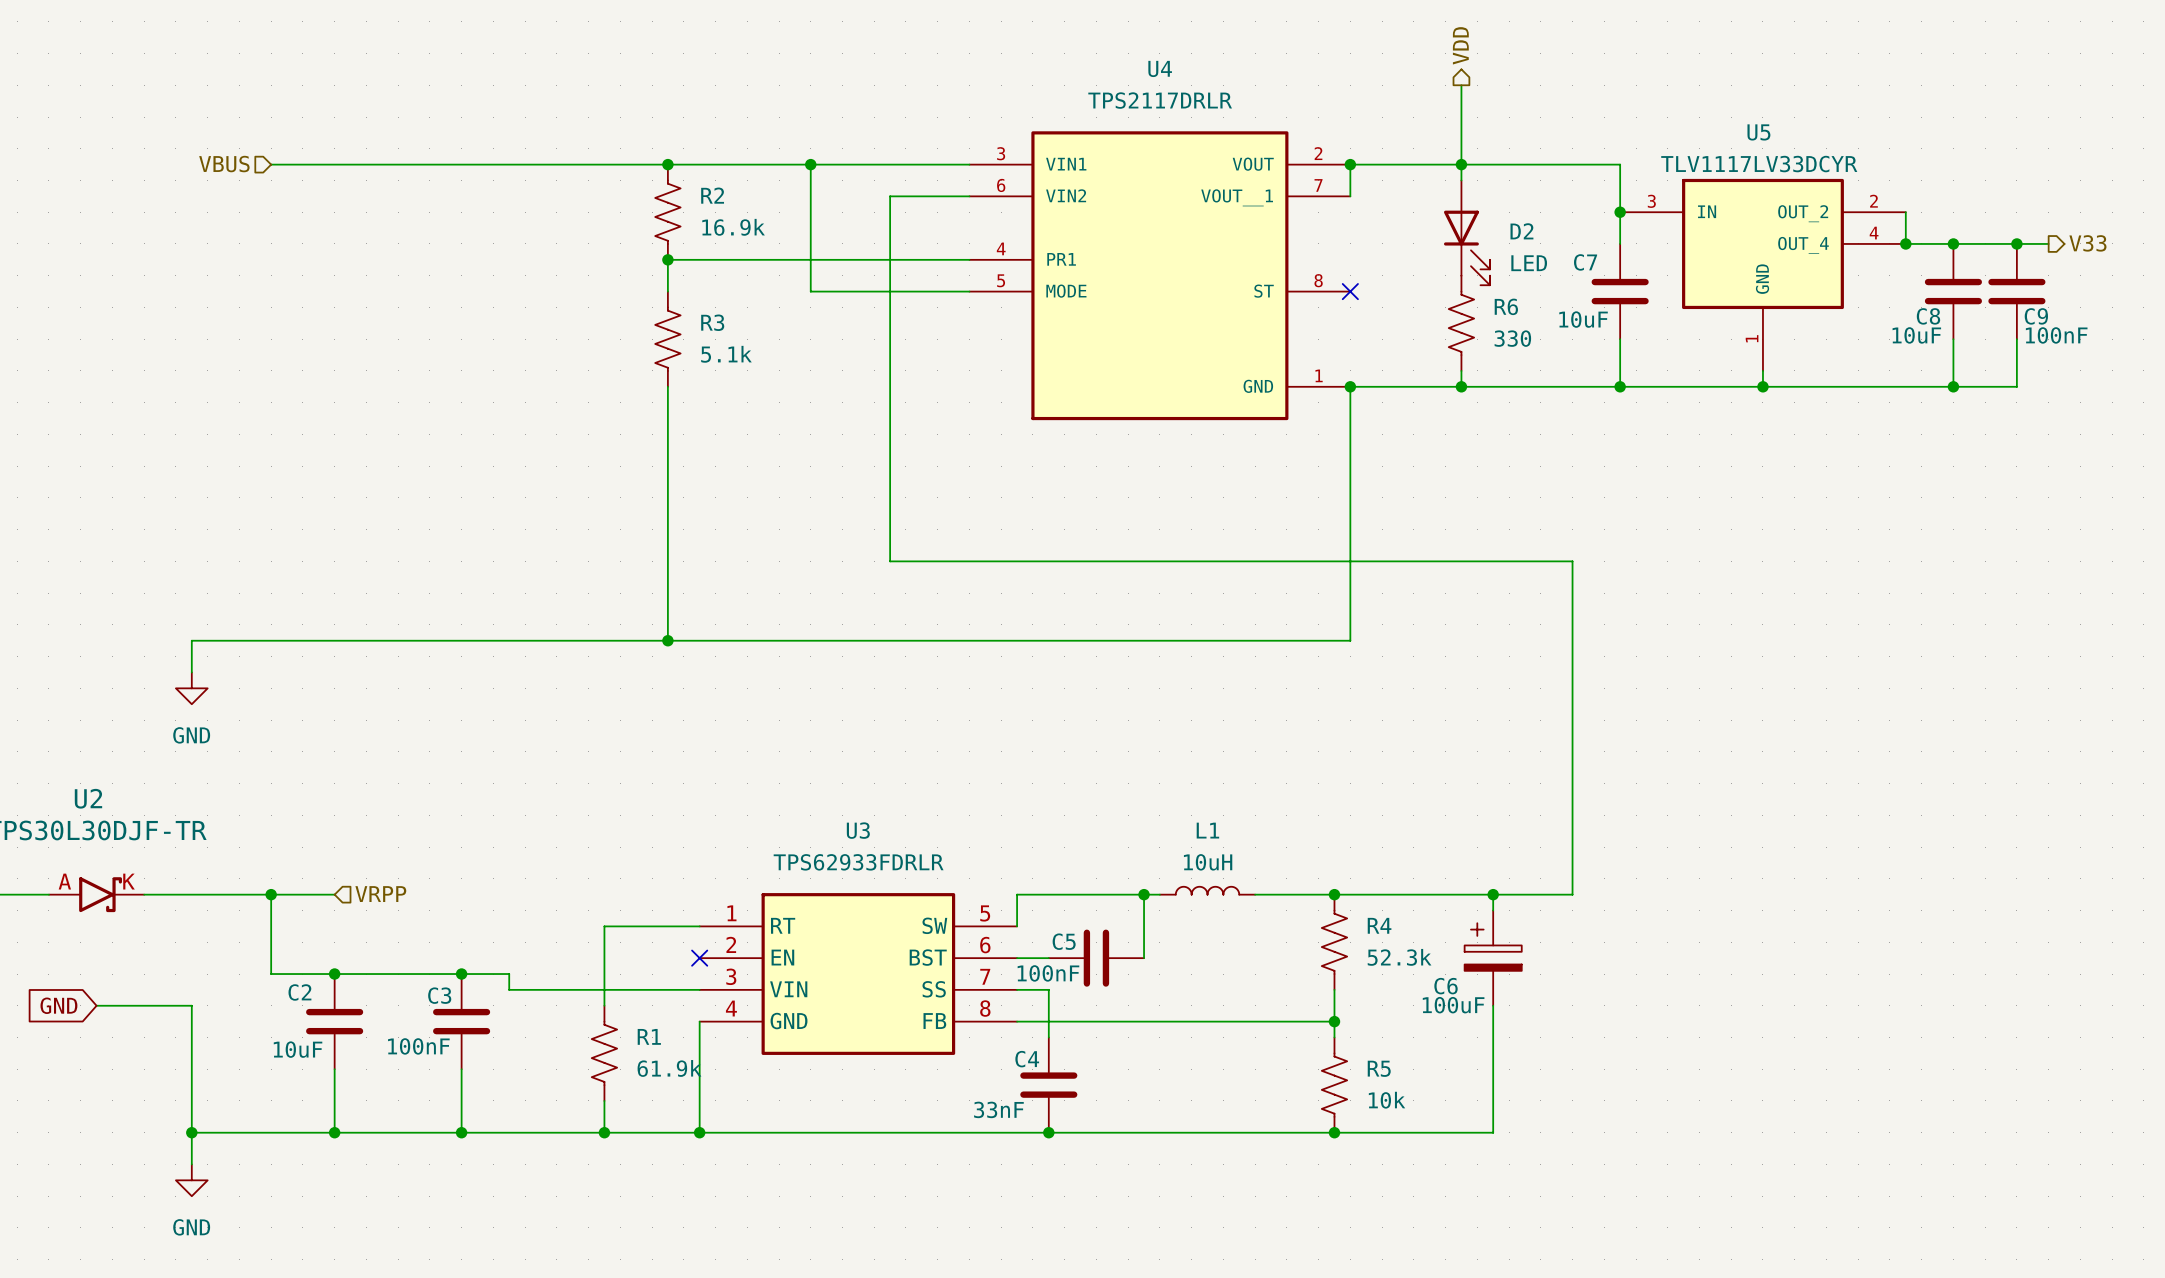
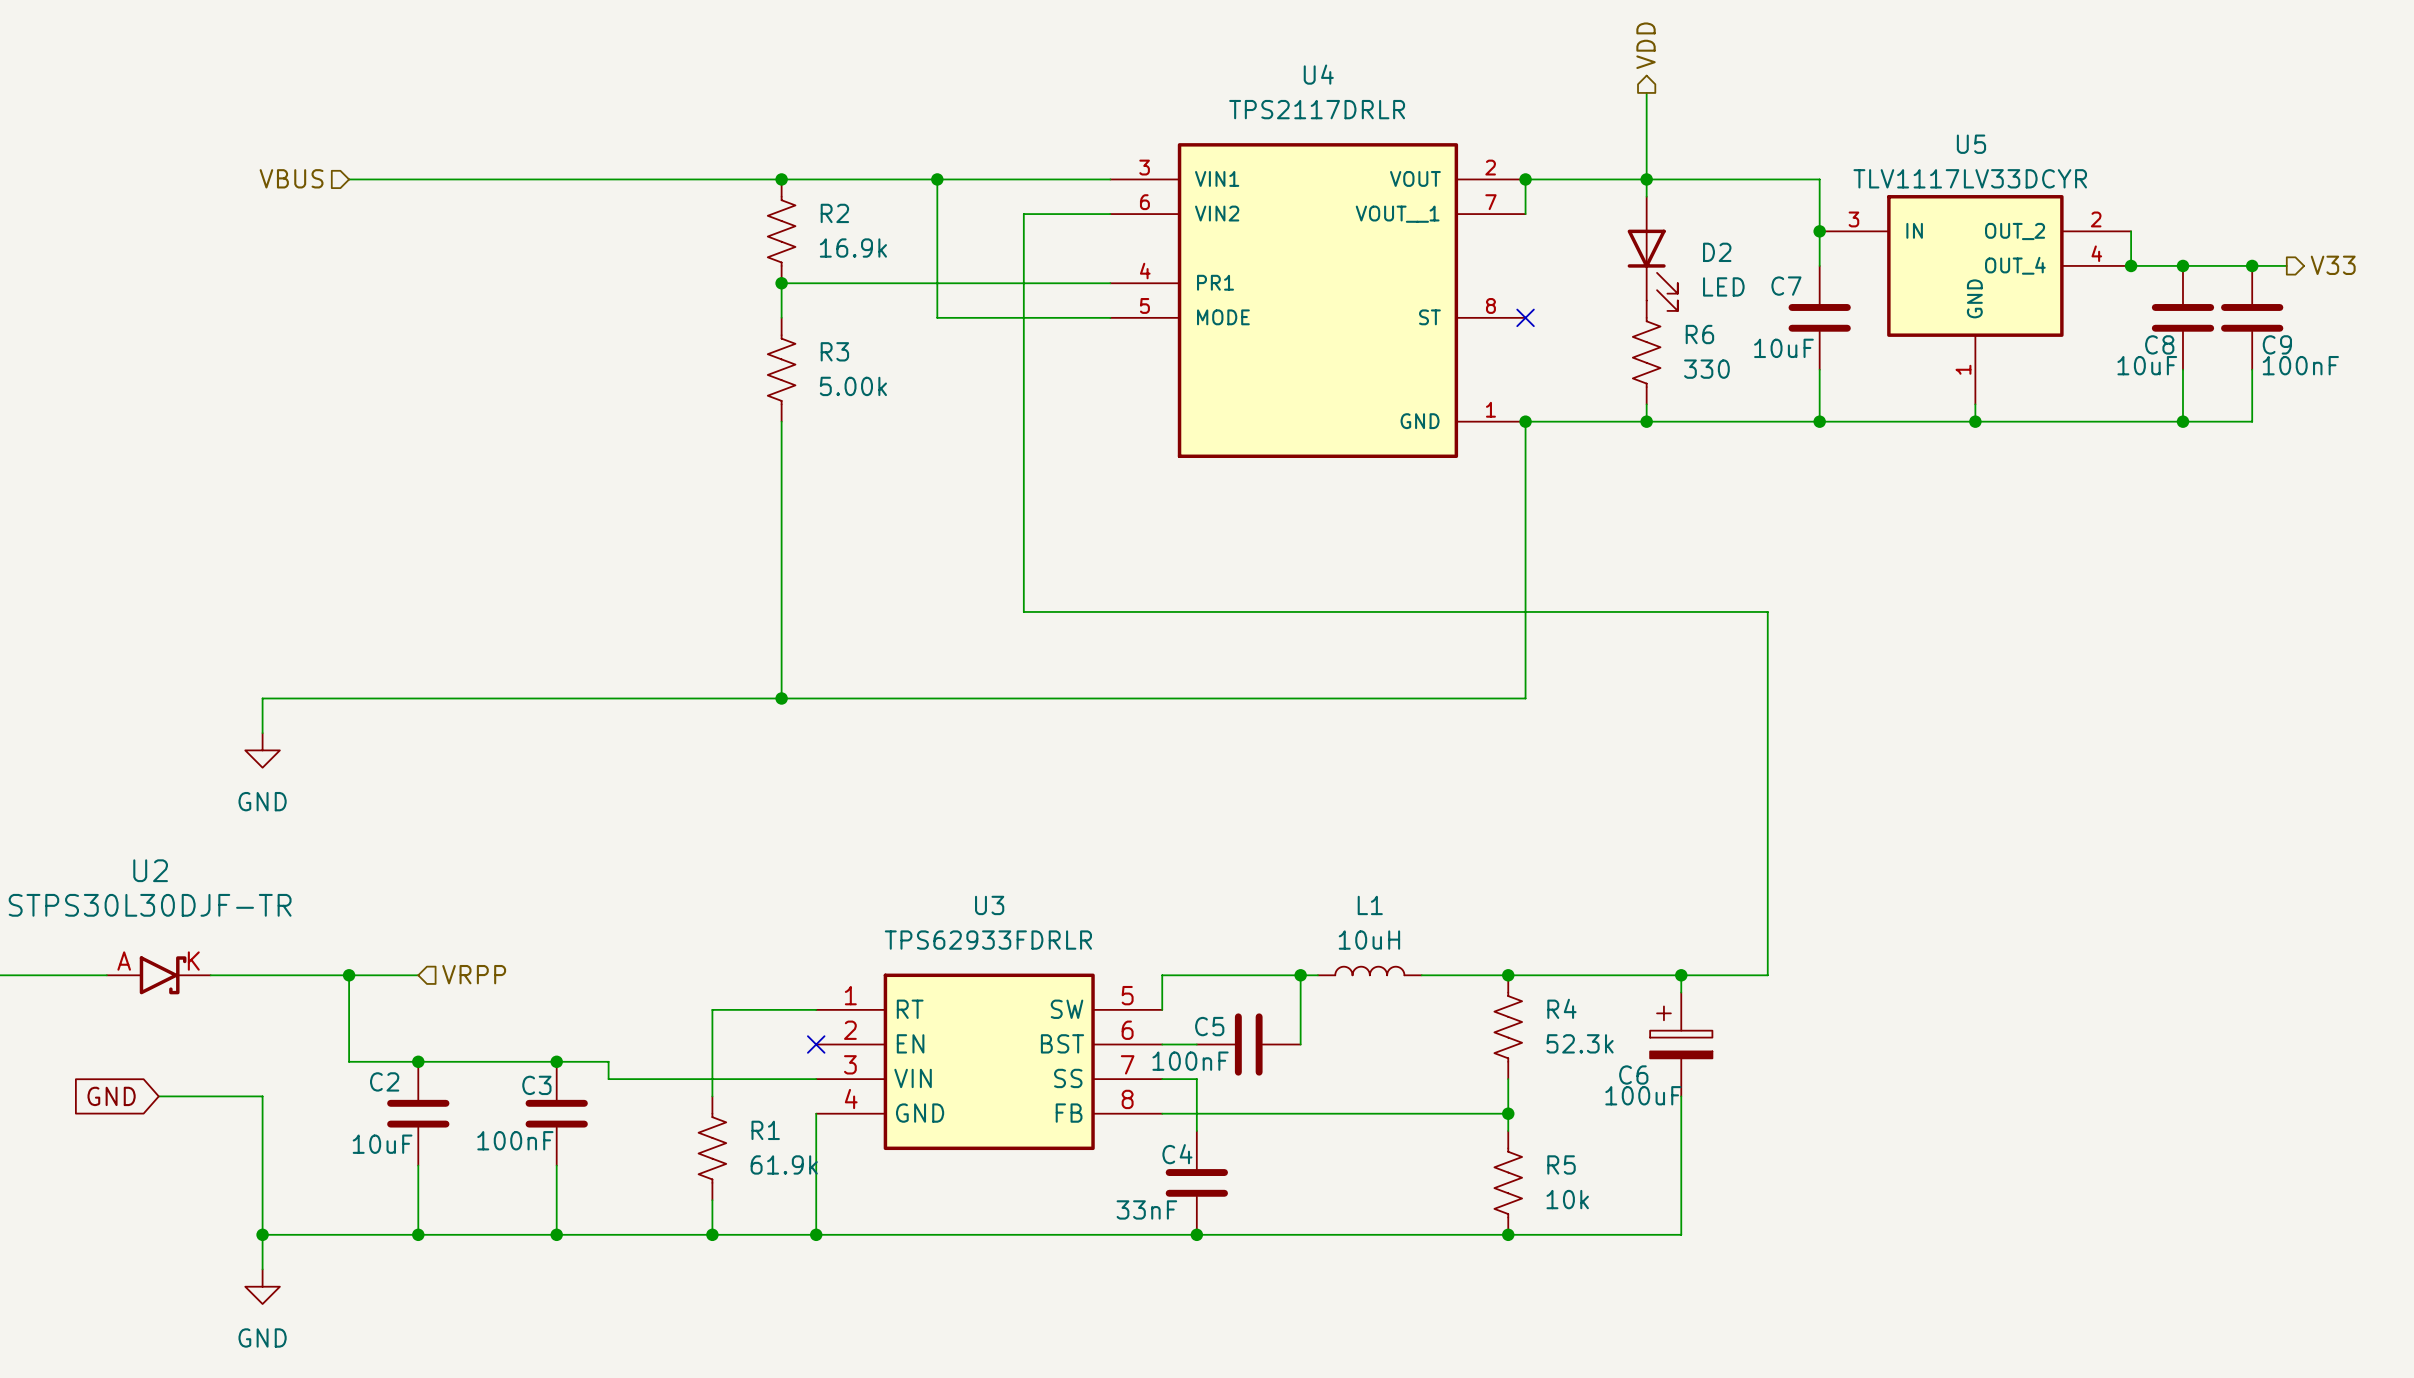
R3 value: 5.1k (726, 354) -> 5.00k (853, 386)

